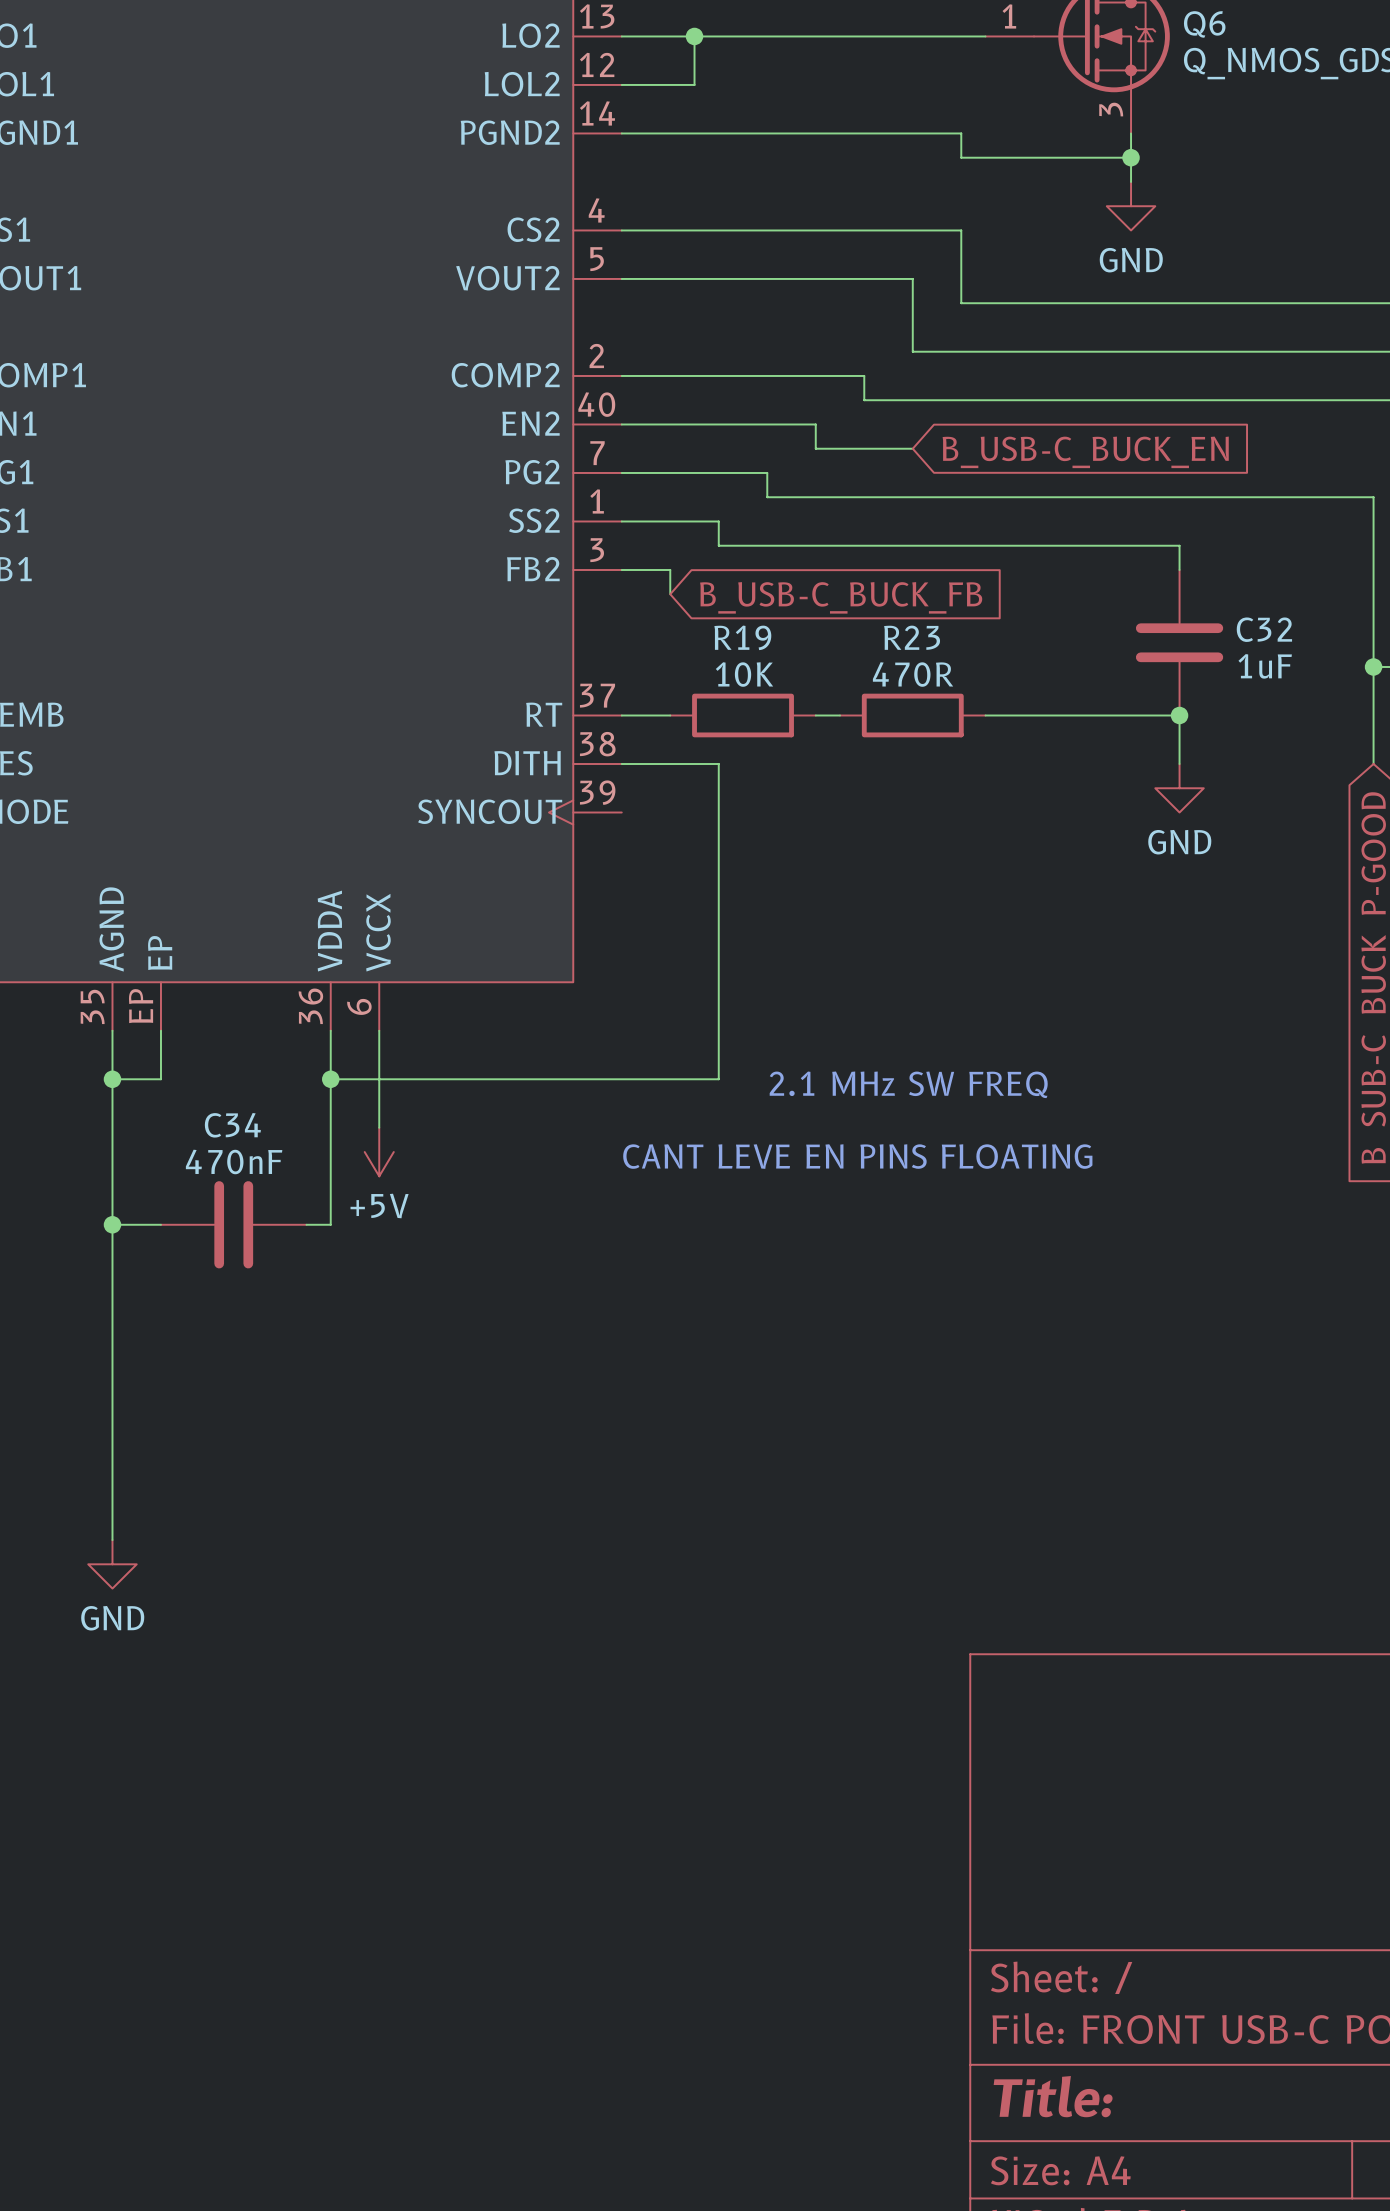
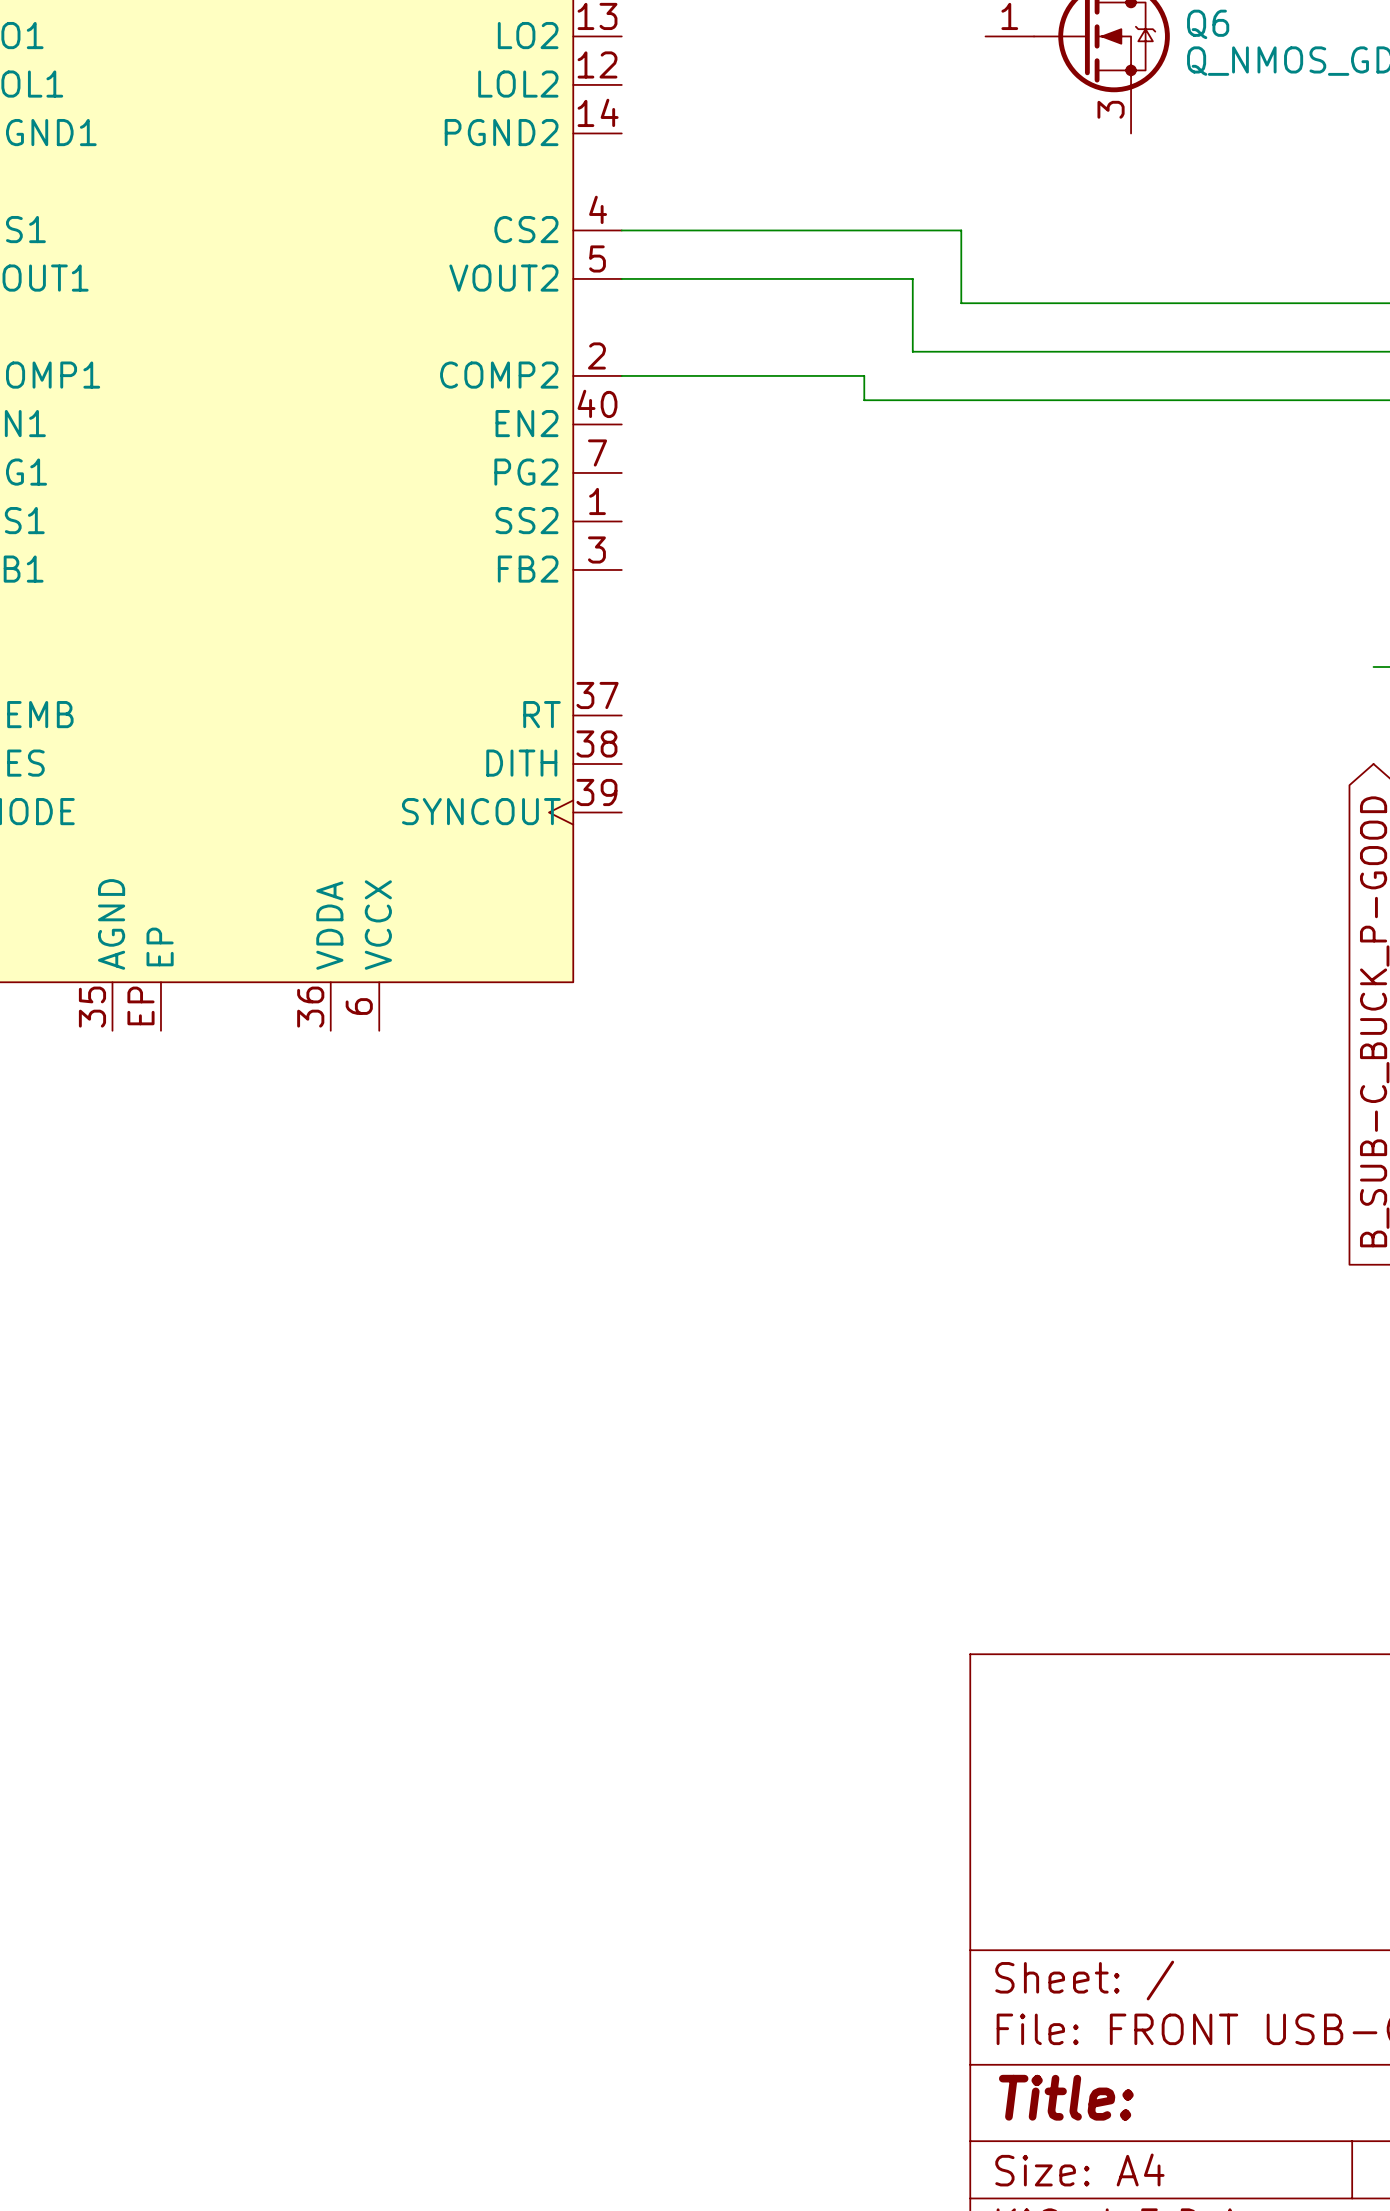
wire: (621, 36) (985, 36) -> none
wire: (694, 36) (694, 84) (621, 84) -> none
junction: (694, 36) -> none
wire: (621, 133) (961, 133) (961, 157) (1131, 157) -> none
wire: (1131, 133) (1131, 181) -> none
junction: (1131, 157) -> none
power symbol: GND (1131, 206) -> none
wire: (621, 424) (815, 424) (815, 448) (912, 448) -> none
global label: B_USB-C_BUCK_EN (1085, 452) -> none
wire: (621, 472) (767, 472) (767, 497) (1373, 497) (1373, 764) -> none
wire: (621, 521) (718, 521) (718, 545) (1179, 545) (1179, 569) -> none
wire: (621, 569) (670, 569) (670, 594) -> none
global label: B_USB-C_BUCK_FB (841, 597) -> none
C32: 1uF (1179, 642) -> none
junction: (1373, 666) -> none
wire: (621, 715) (670, 715) -> none
R19: 10K (743, 715) -> none
wire: (815, 715) (840, 715) -> none
R23: 470R (912, 715) -> none
wire: (985, 715) (1179, 715) (1179, 764) -> none
junction: (1179, 715) -> none
wire: (621, 764) (718, 764) (718, 1079) (330, 1079) -> none
power symbol: GND (1179, 788) -> none
wire: (112, 1030) (112, 1540) -> none
wire: (160, 1030) (160, 1079) (112, 1079) -> none
wire: (330, 1030) (330, 1224) (306, 1224) -> none
wire: (379, 1030) (379, 1127) -> none
junction: (112, 1079) -> none
junction: (330, 1079) -> none
text: 2.1 MHz SW FREQ (908, 1084) -> none
power symbol: +5V (379, 1152) -> none
text: CANT LEVE EN PINS FLOATING (857, 1156) -> none
wire: (112, 1224) (160, 1224) -> none
junction: (112, 1224) -> none
C34: 470nF (233, 1224) -> none
power symbol: GND (112, 1564) -> none

